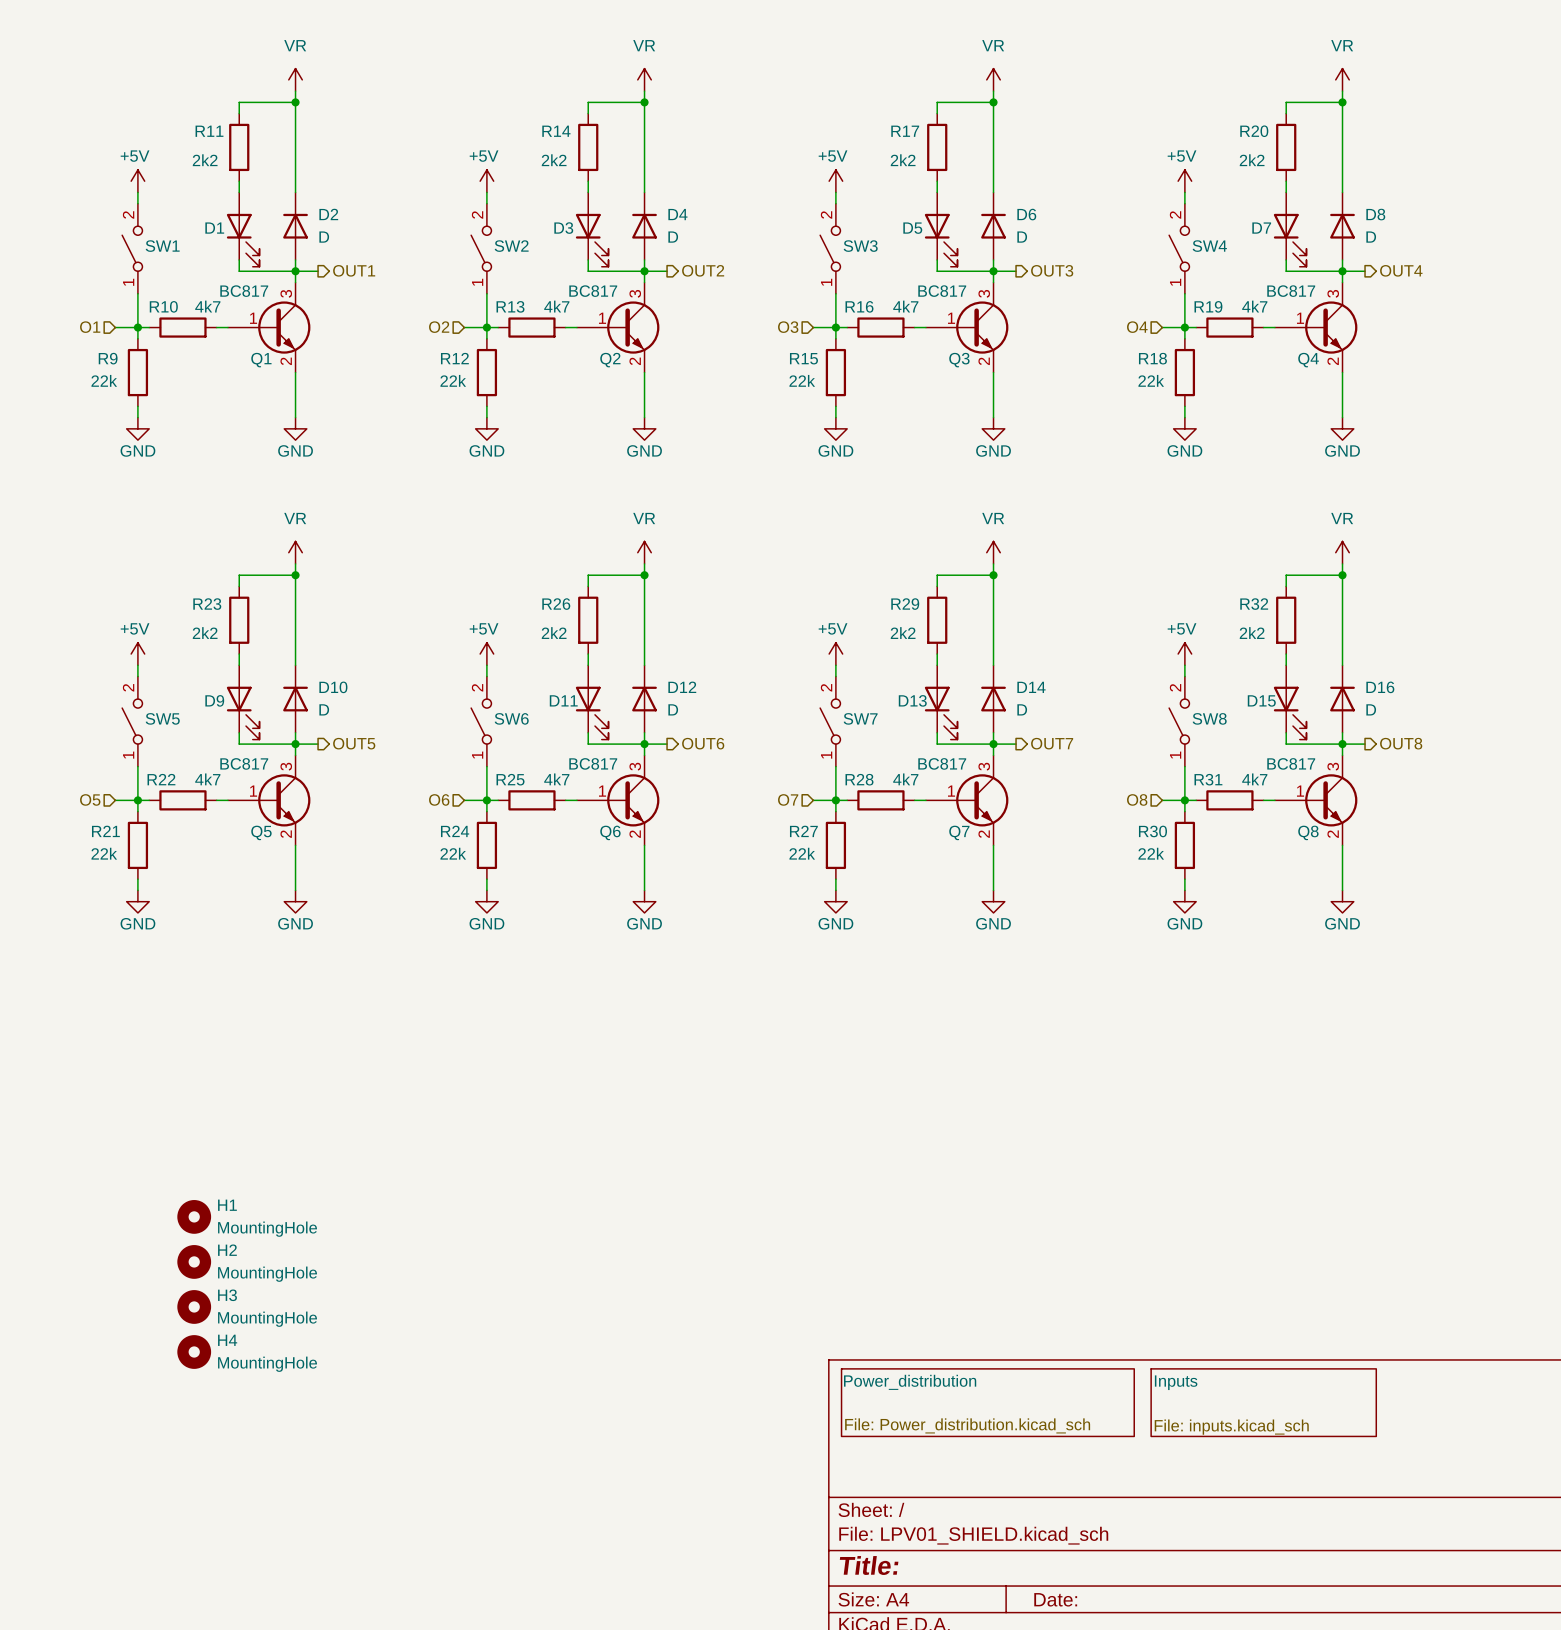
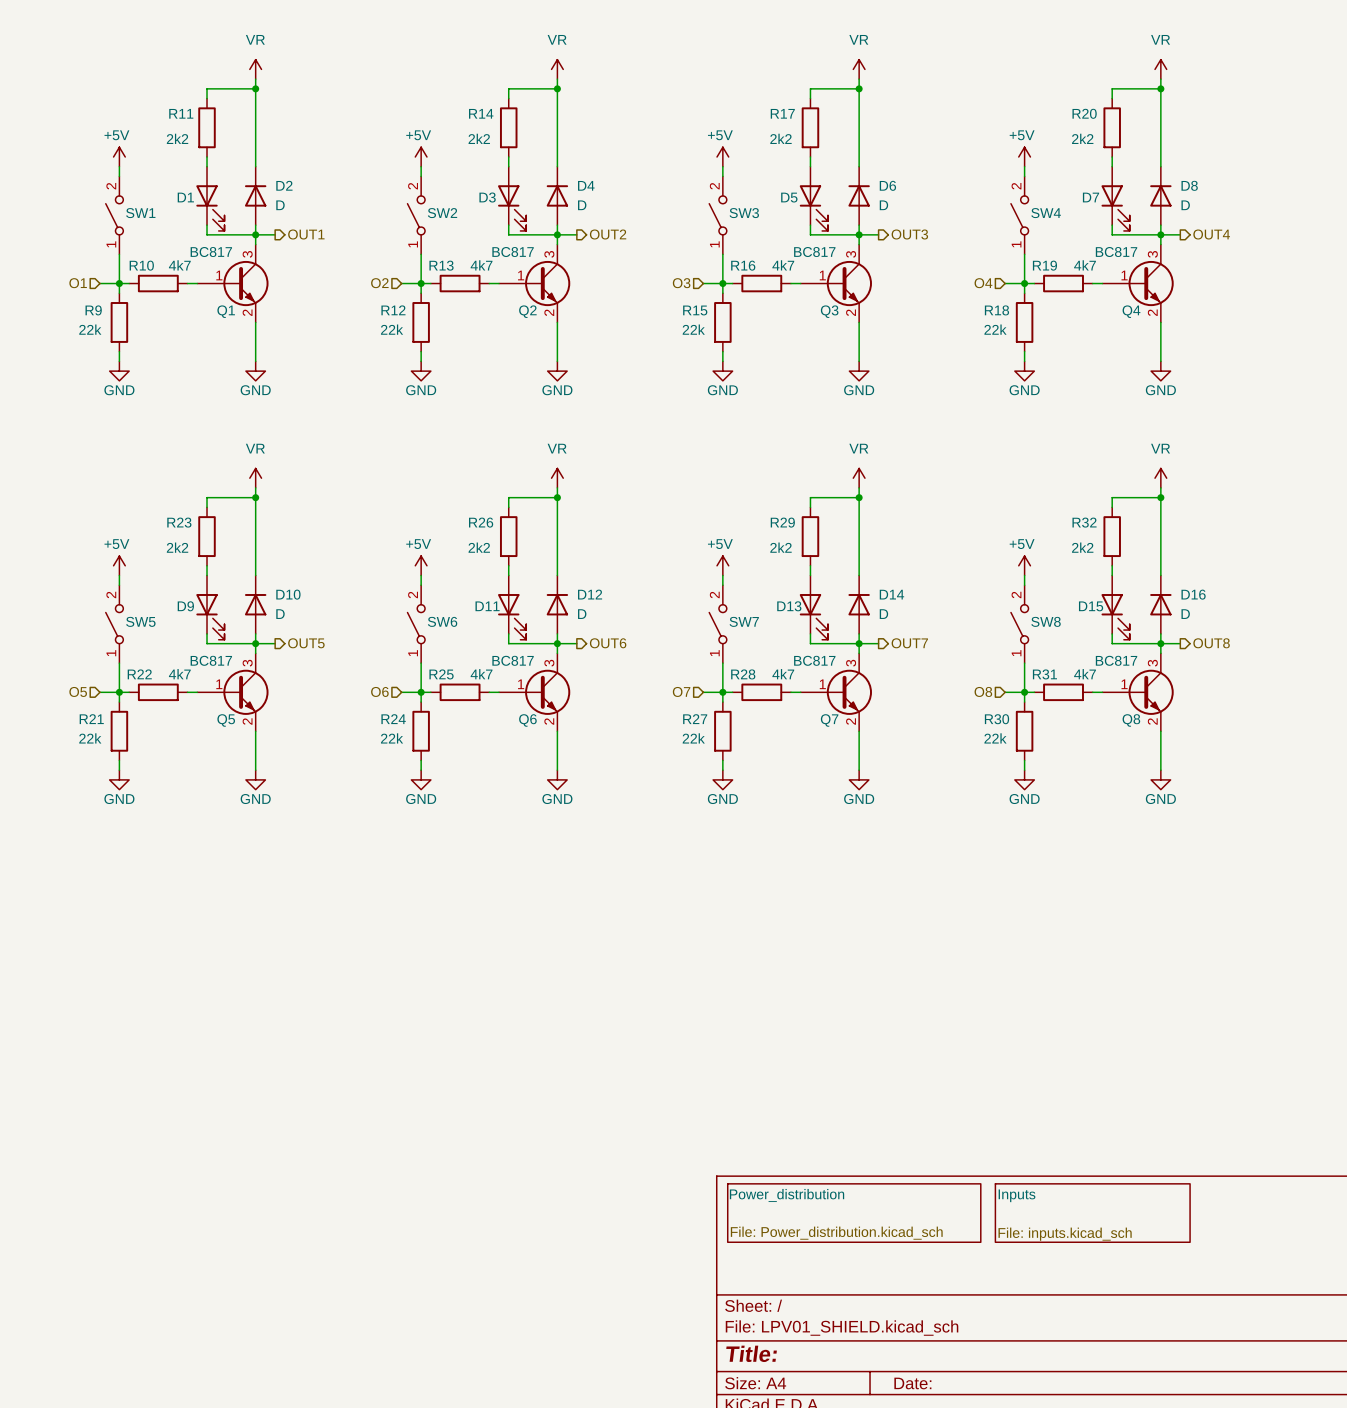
H1: MountingHole (194, 1216) -> none
H2: MountingHole (194, 1261) -> none
H3: MountingHole (194, 1306) -> none
H4: MountingHole (194, 1352) -> none

